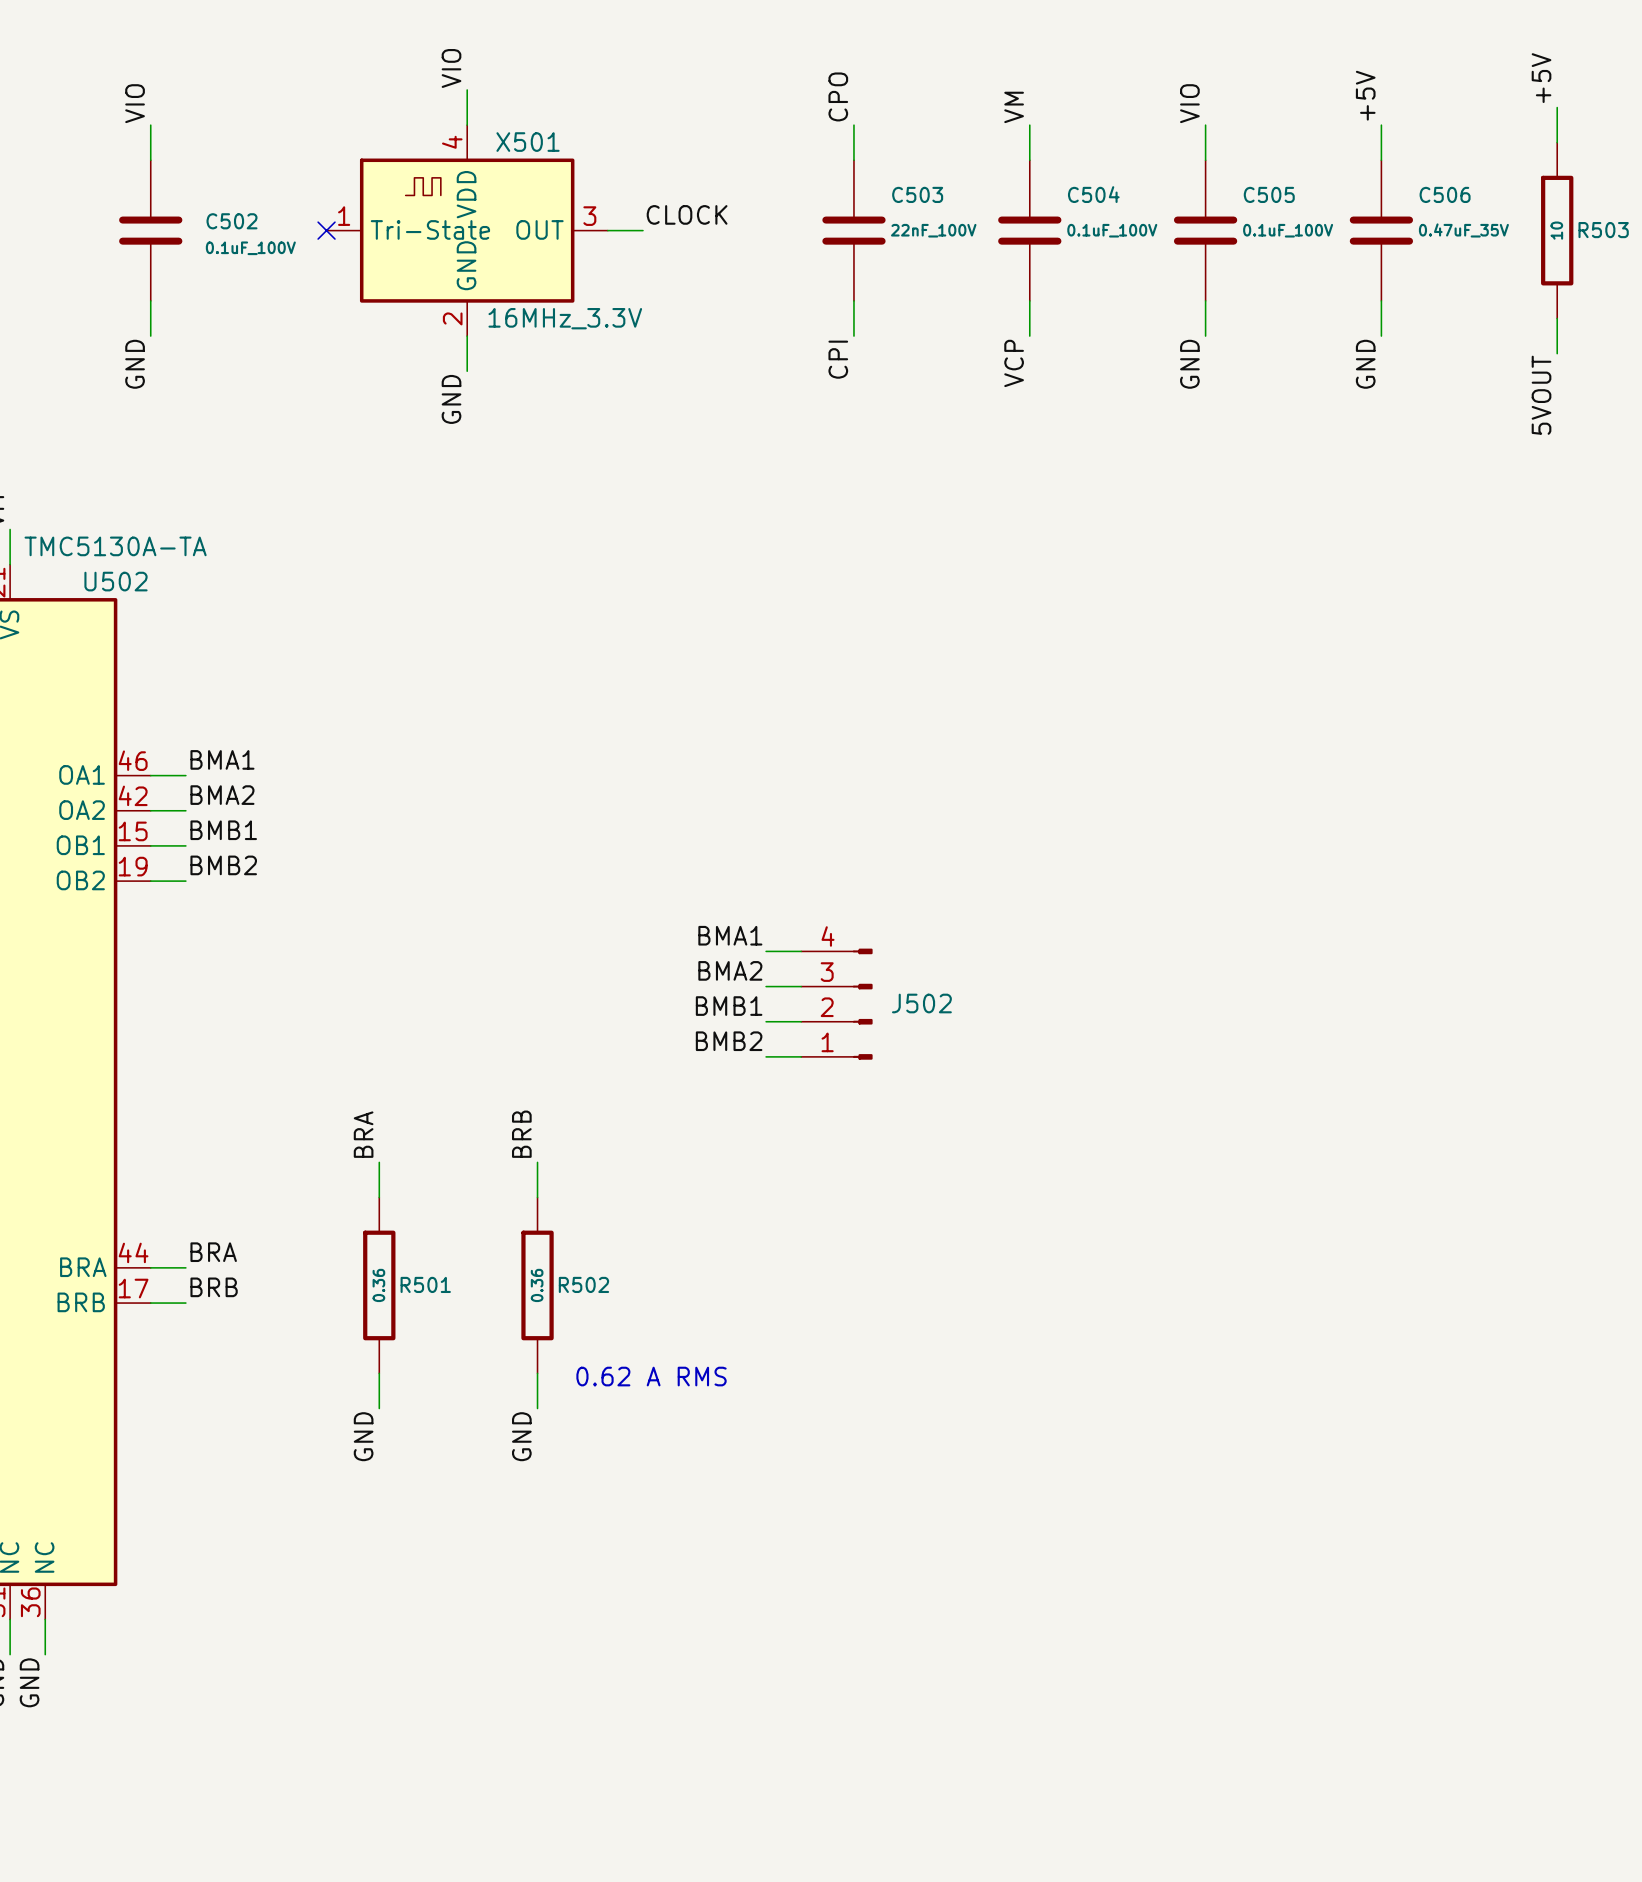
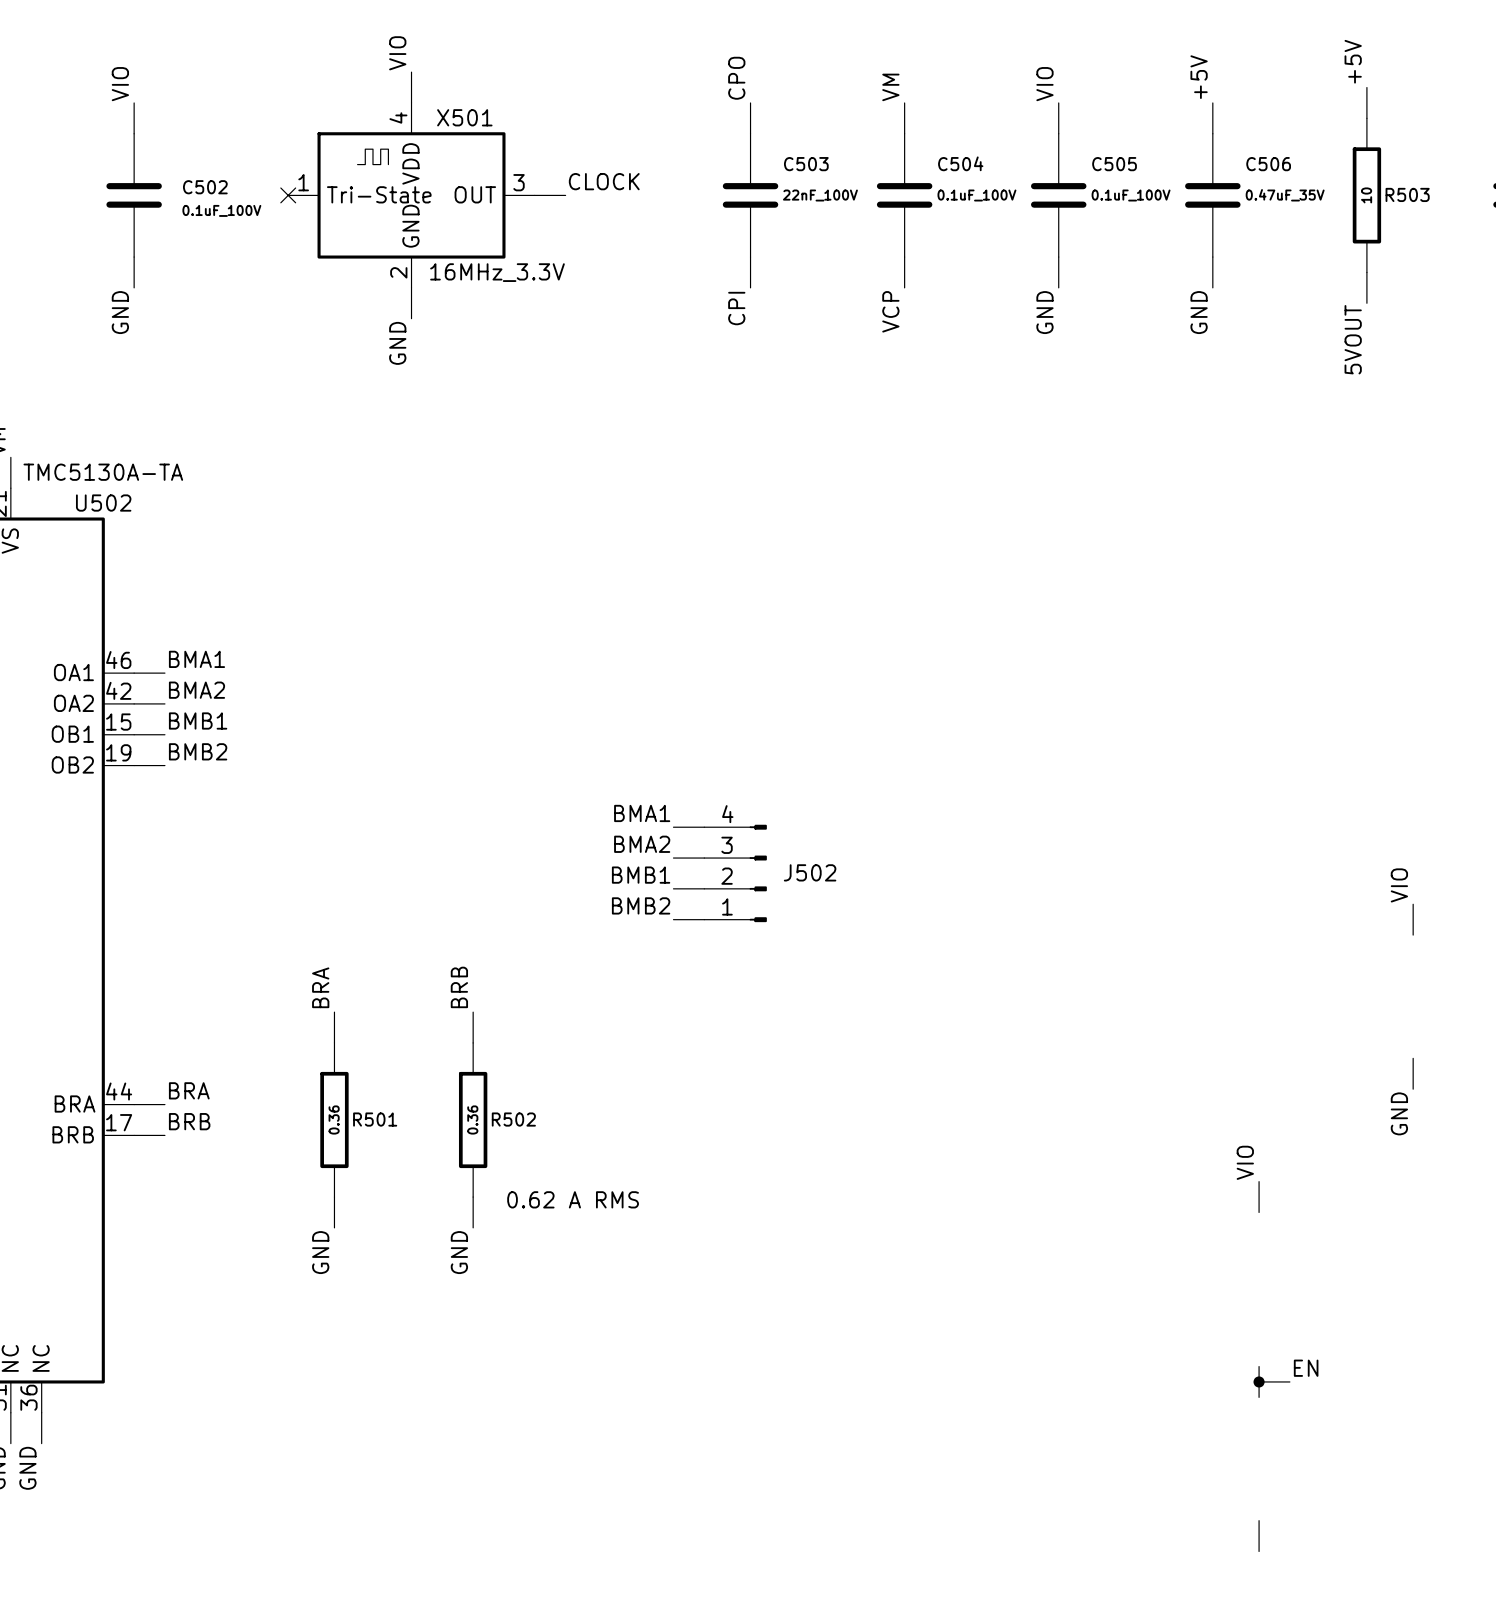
label: none -> VIO (1399, 885)
wire: none -> (1413, 904) (1413, 935)
wire: none -> (1413, 1058) (1413, 1089)
label: none -> GND (1399, 1113)
label: none -> VIO (1245, 1162)
wire: none -> (1259, 1181) (1259, 1212)
wire: none -> (1259, 1366) (1259, 1397)
label: none -> EN (1306, 1368)
wire: none -> (1259, 1381) (1289, 1381)
junction: none -> (1259, 1381)
wire: none -> (1259, 1520) (1259, 1551)

